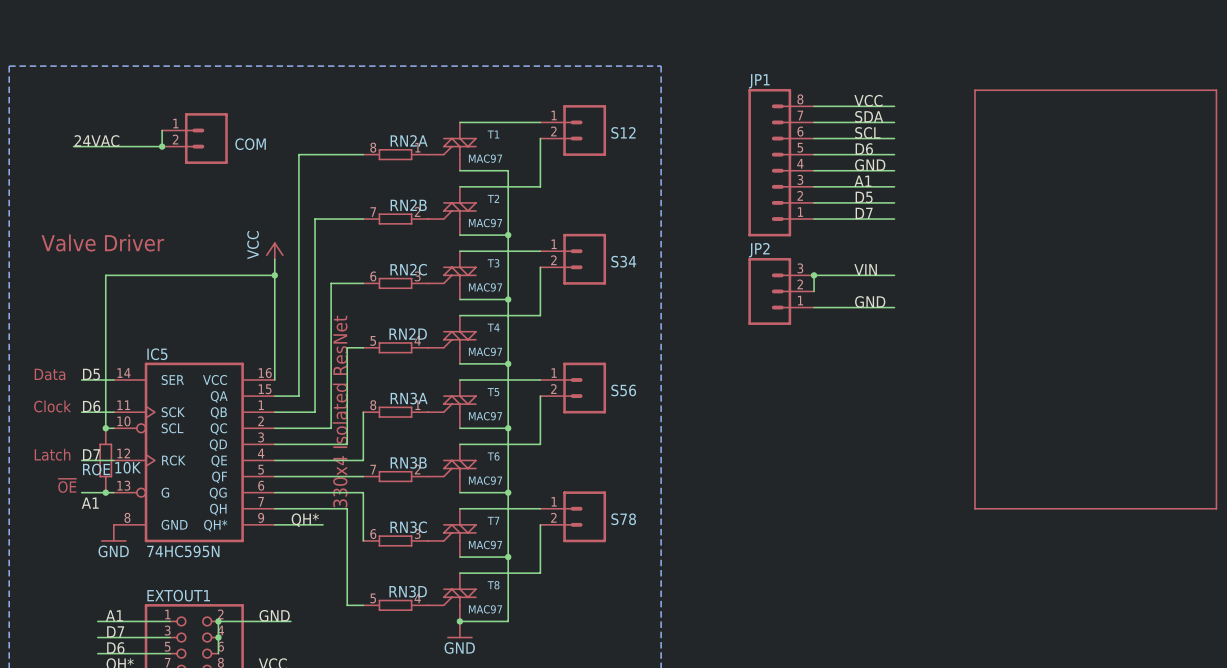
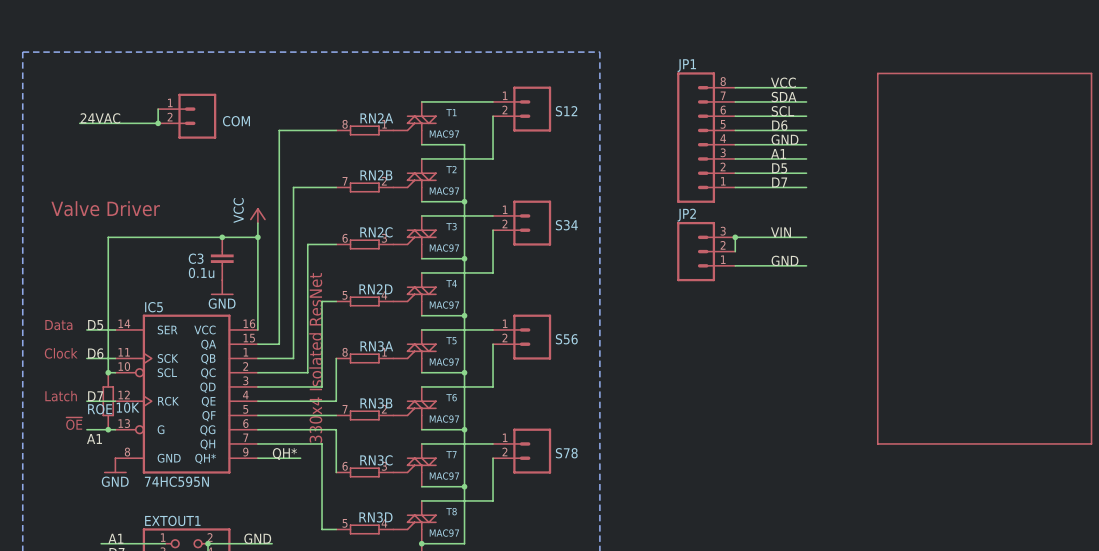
junction: none -> (222, 237)
C3: none -> 0.1u (222, 258)
power symbol: none -> GND (222, 287)

